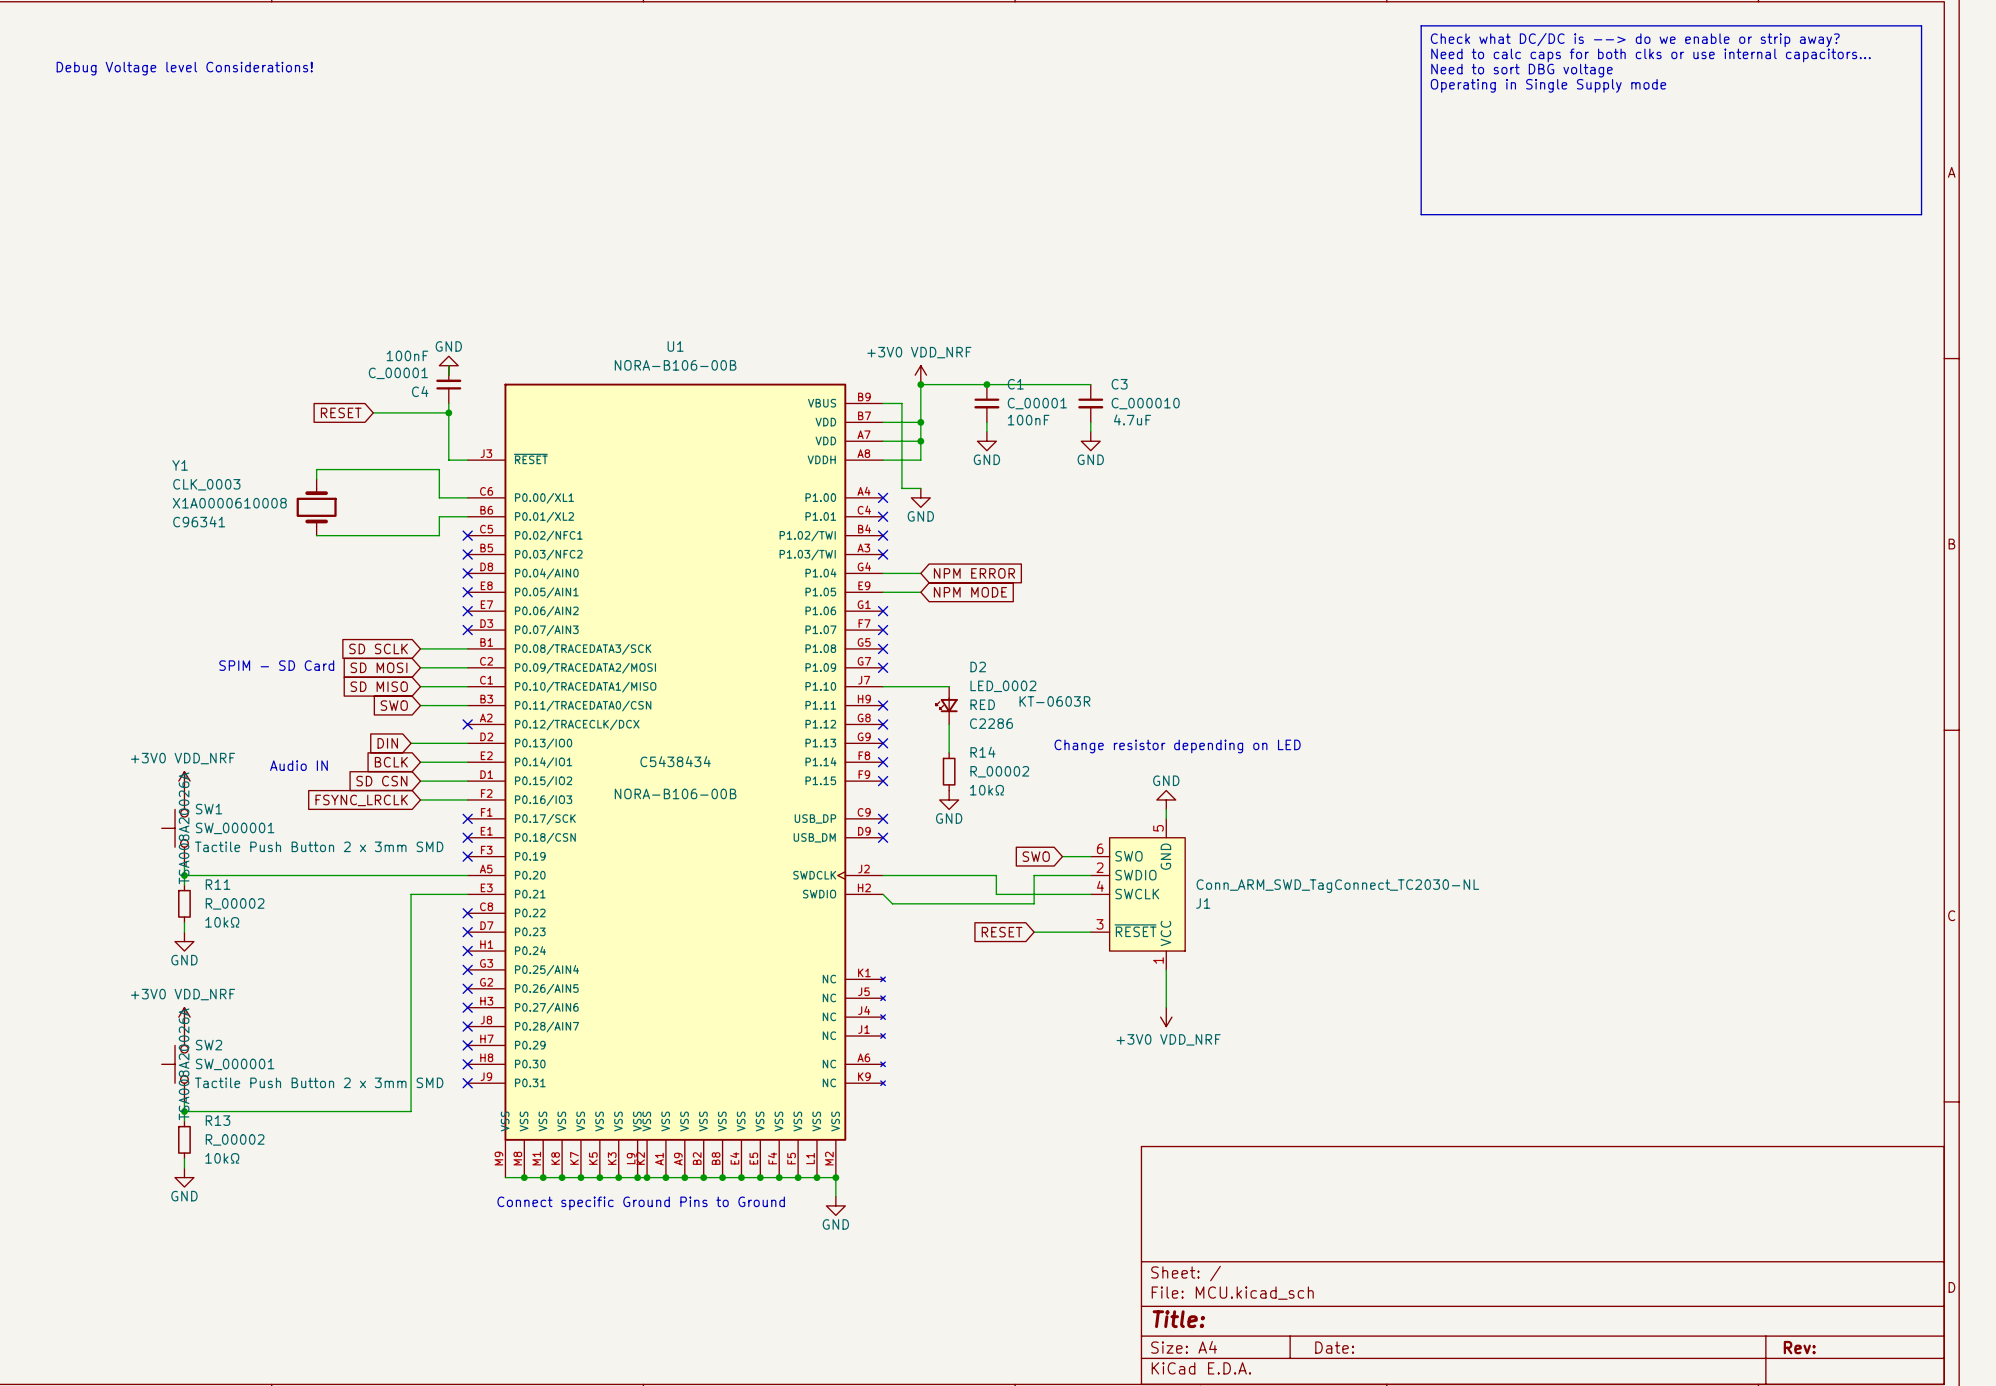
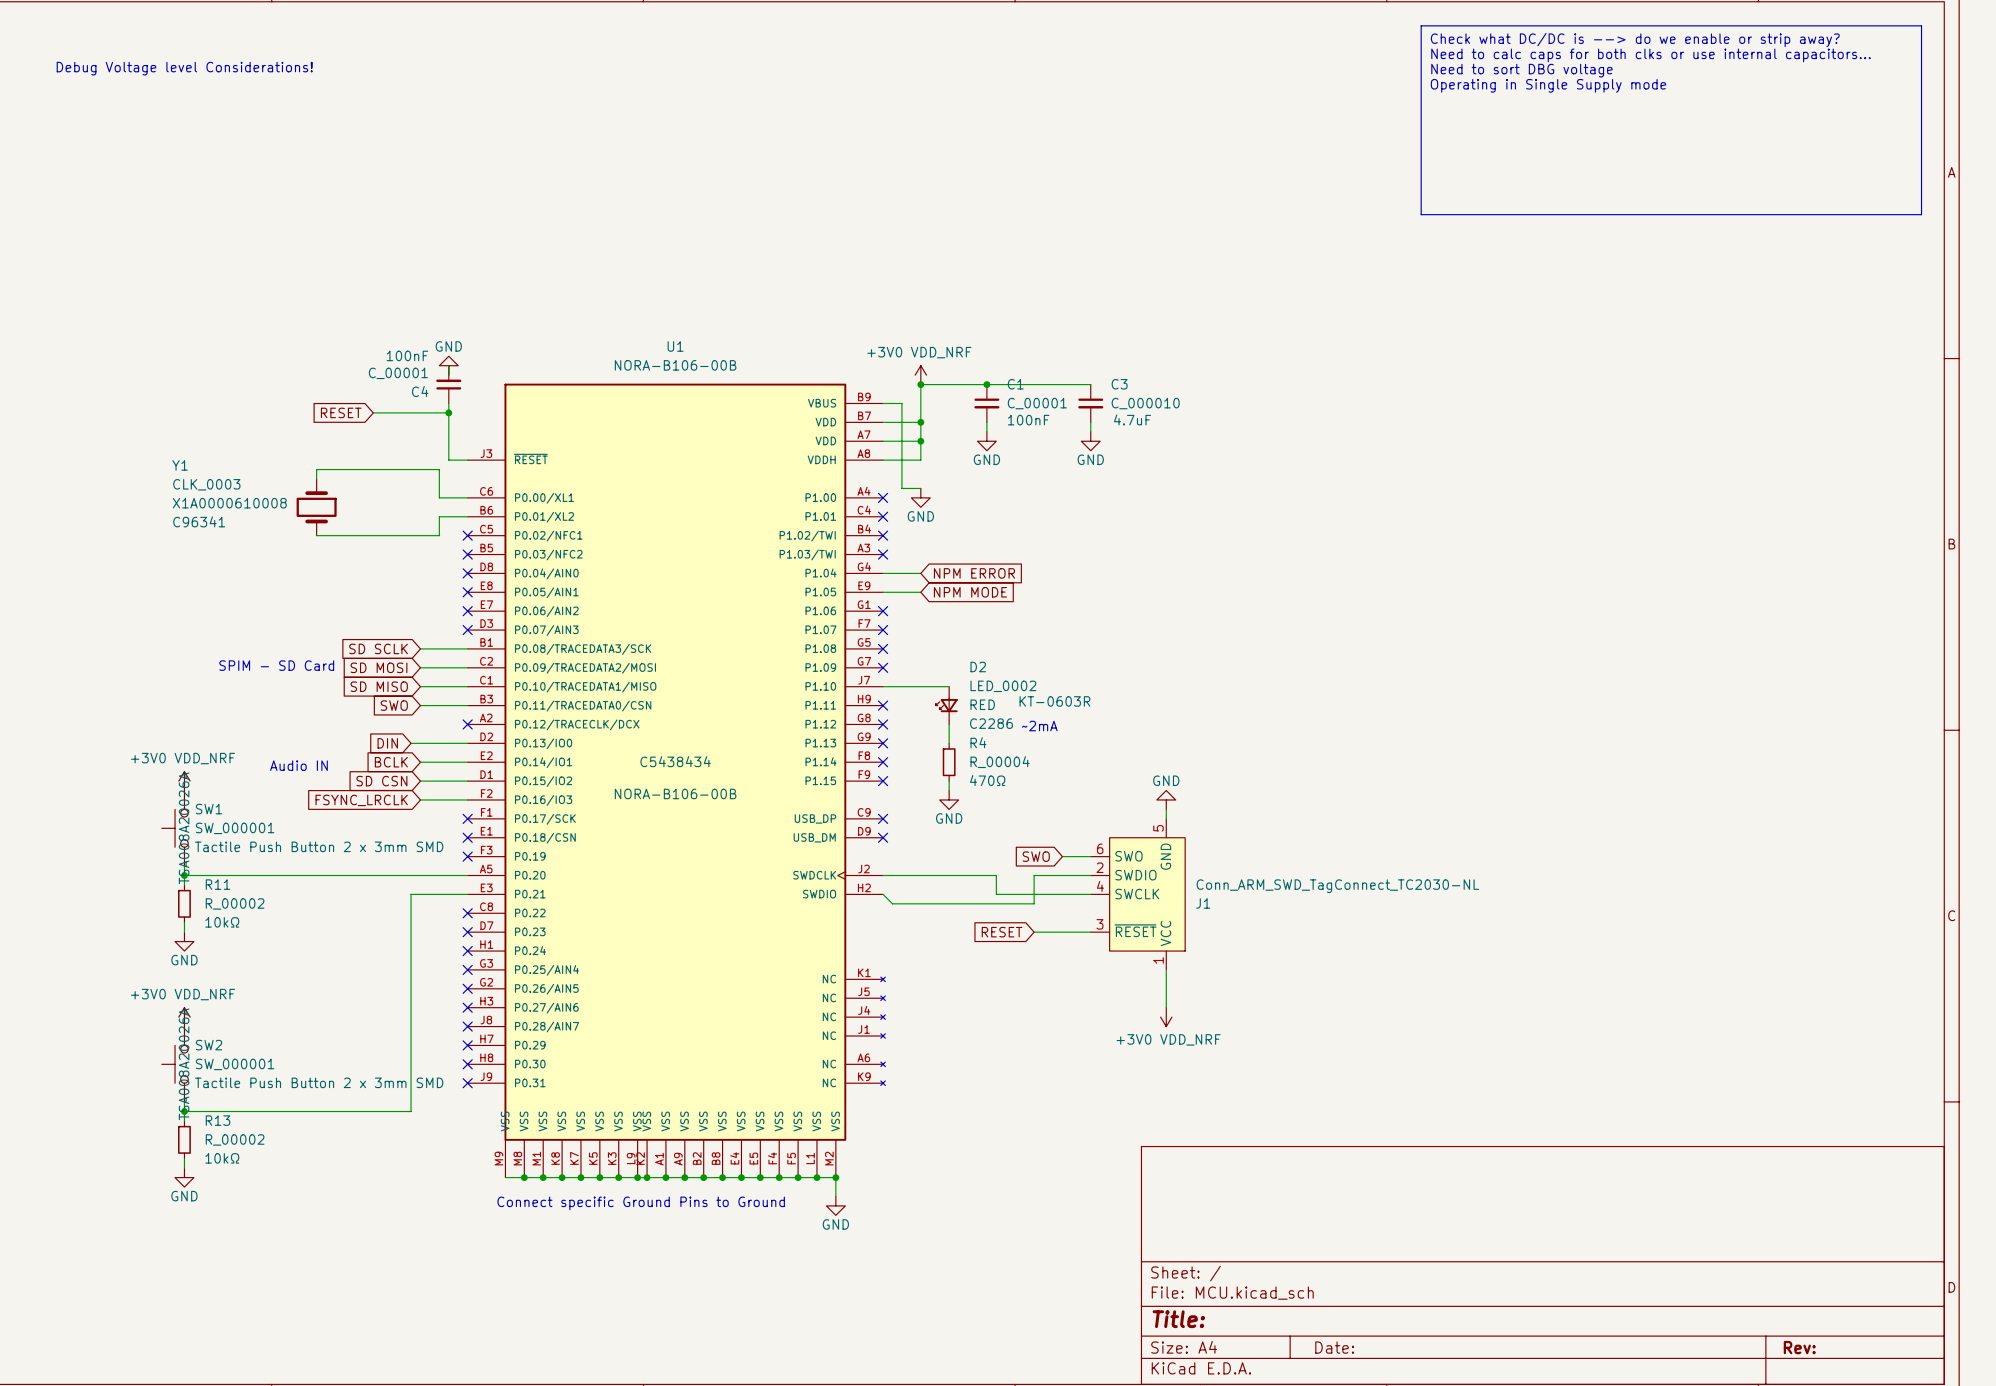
text: none -> ~2mA (1039, 726)
text: Change resistor depending on LED (1177, 746) -> none
R4: none -> R_00004 (949, 762)
R14: R_00002 (949, 771) -> none

